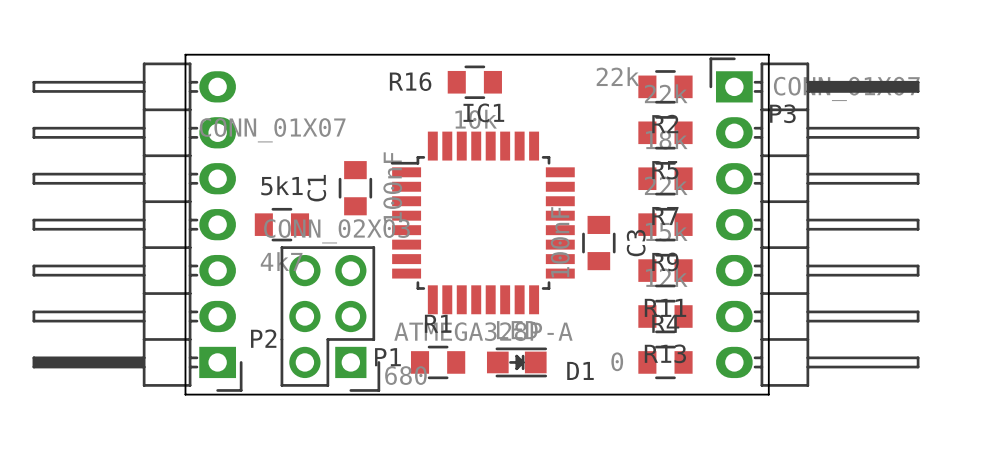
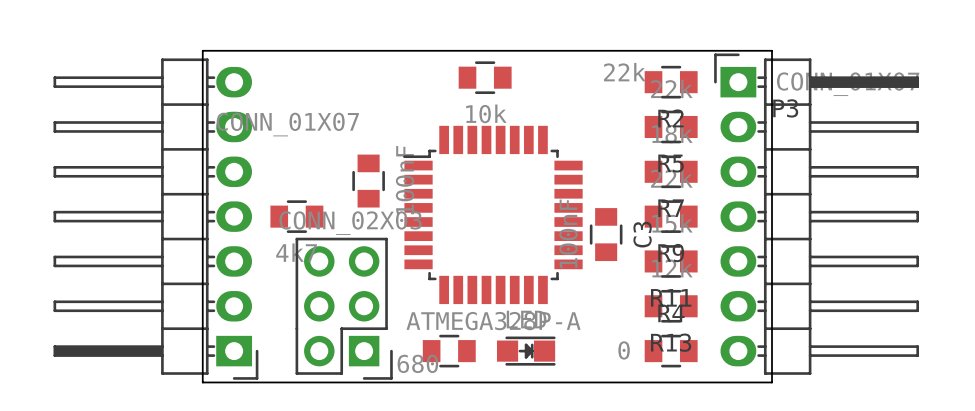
R16 name: R16 (410, 81) -> none
IC1 name: IC1 (483, 112) -> none
5k1 name: 5k1 (281, 185) -> none
C1 name: C1 (316, 188) -> none
R1 name: R1 (438, 323) -> none
P2 name: P2 (263, 338) -> none
P1 name: P1 (387, 357) -> none
D1 name: D1 (580, 370) -> none

